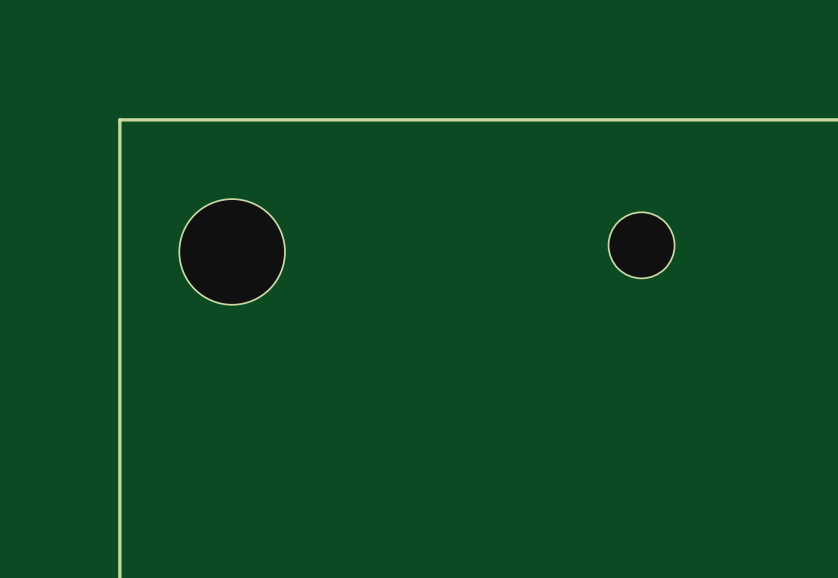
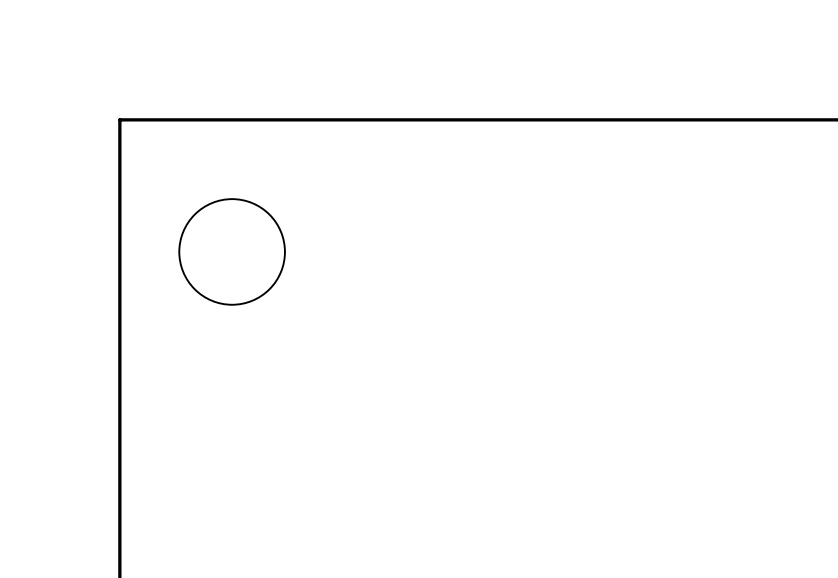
part: (641, 245) -> none

